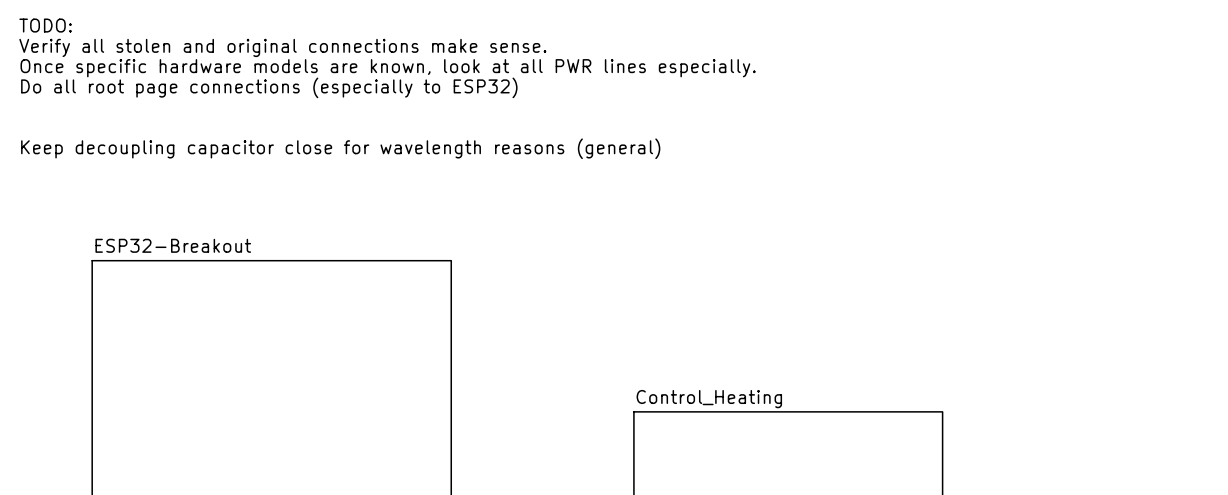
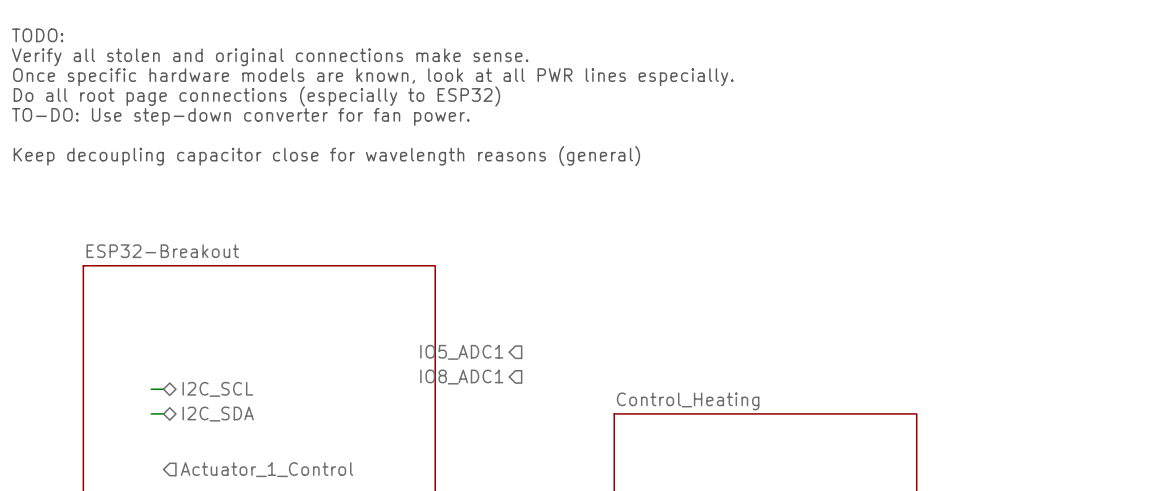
text: none -> TO-DO: Use step-down converter for fan power. (240, 116)
sheet pin: none -> IO5_ADC1 (461, 352)
sheet pin: none -> IO8_ADC1 (461, 377)
wire: none -> (151, 389) (163, 389)
sheet pin: none -> I2C_SCL (217, 389)
wire: none -> (151, 413) (163, 413)
sheet pin: none -> I2C_SDA (218, 414)
sheet pin: none -> Actuator_1_Control (266, 469)

